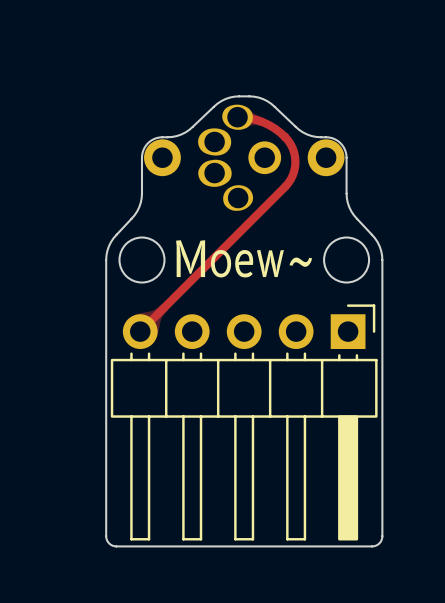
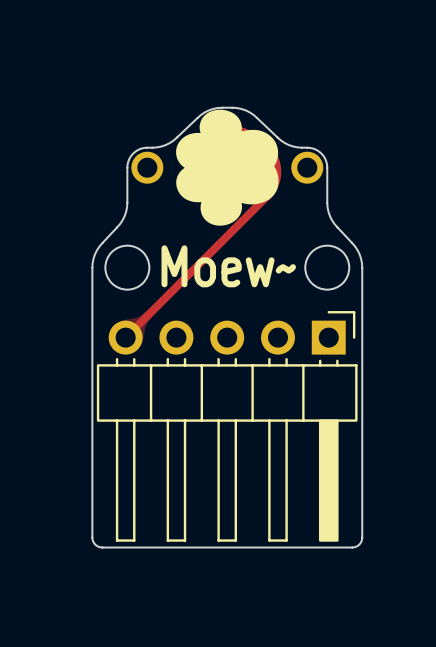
part footprint: [144, 104, 345, 211] -> [131, 109, 324, 226]

